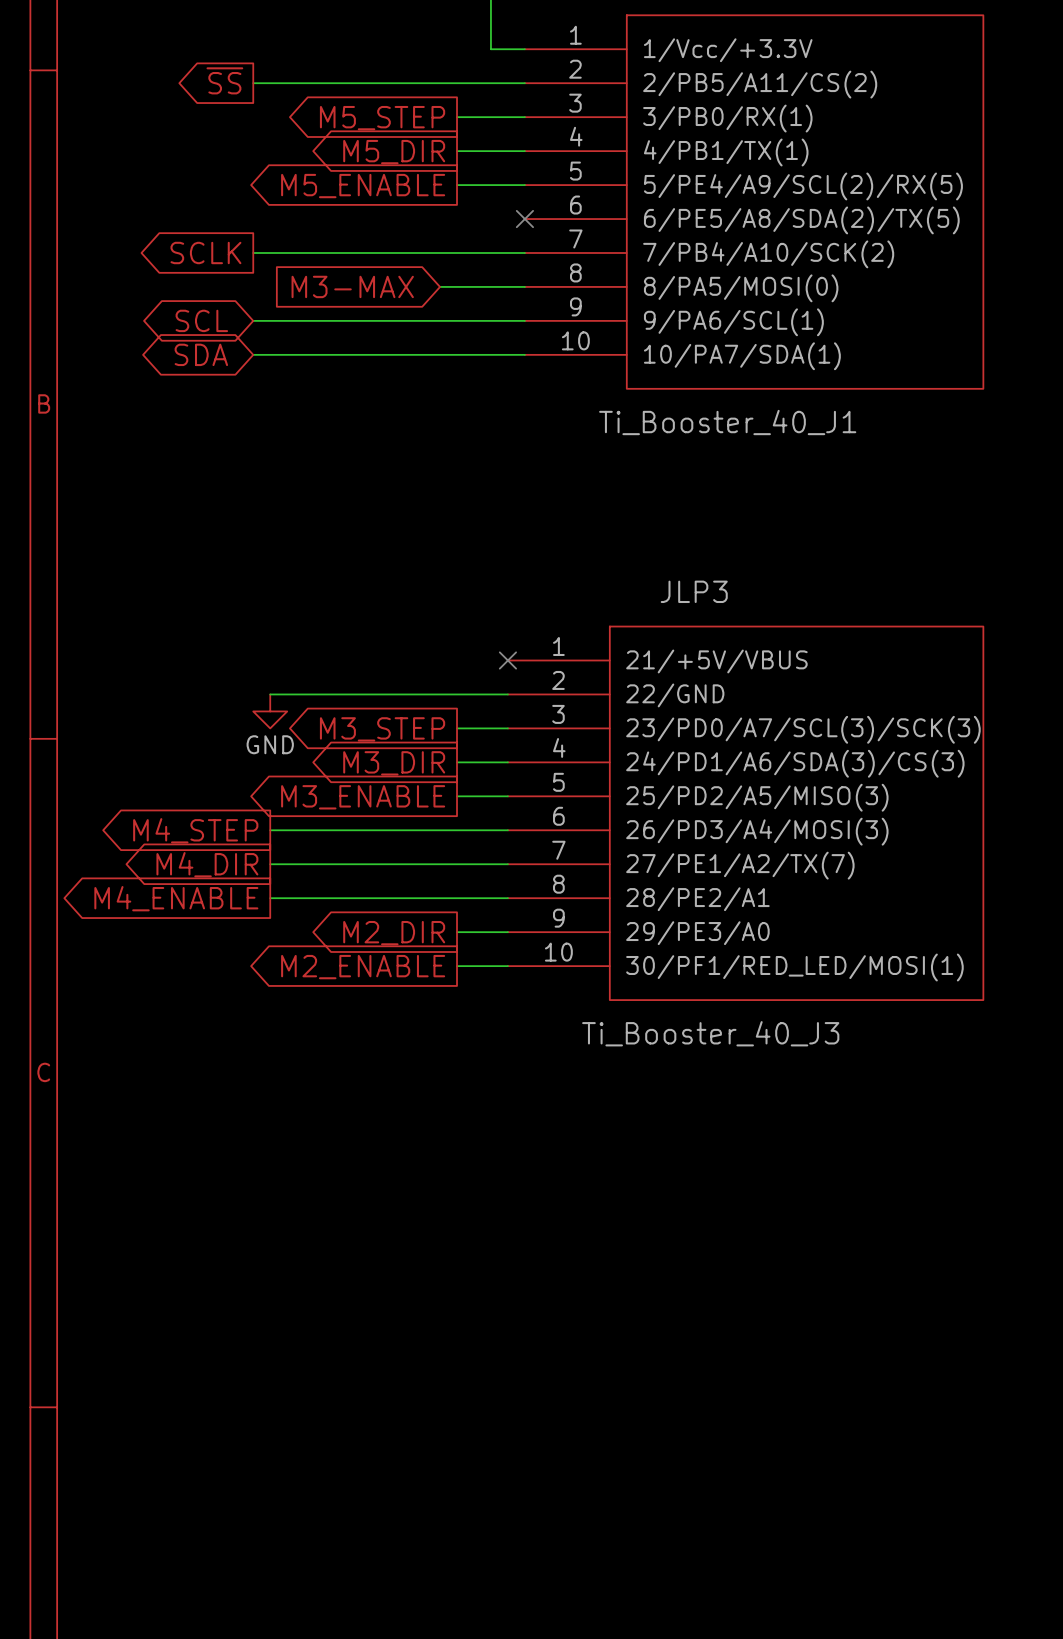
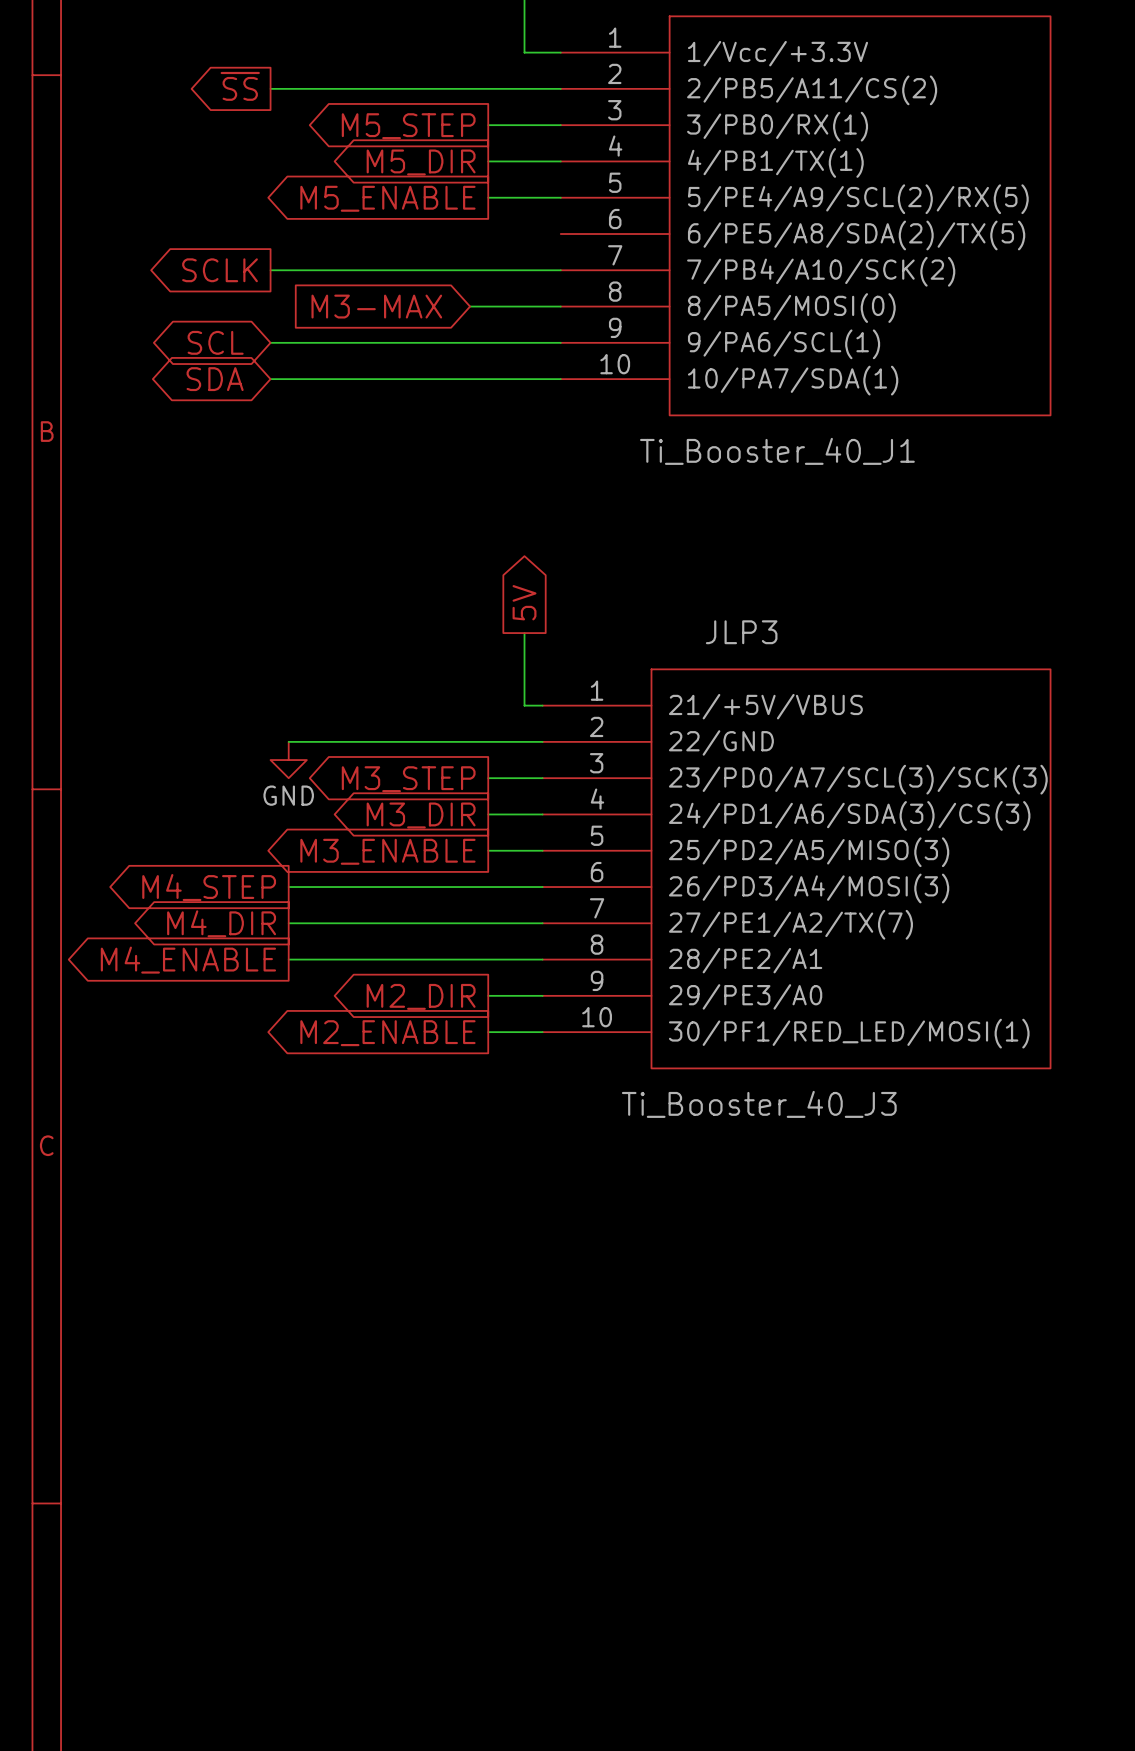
no-connect mark: (524, 219) -> none
global label: none -> 5V (524, 602)
wire: none -> (524, 633) (524, 705) (542, 705)
no-connect mark: (507, 660) -> none

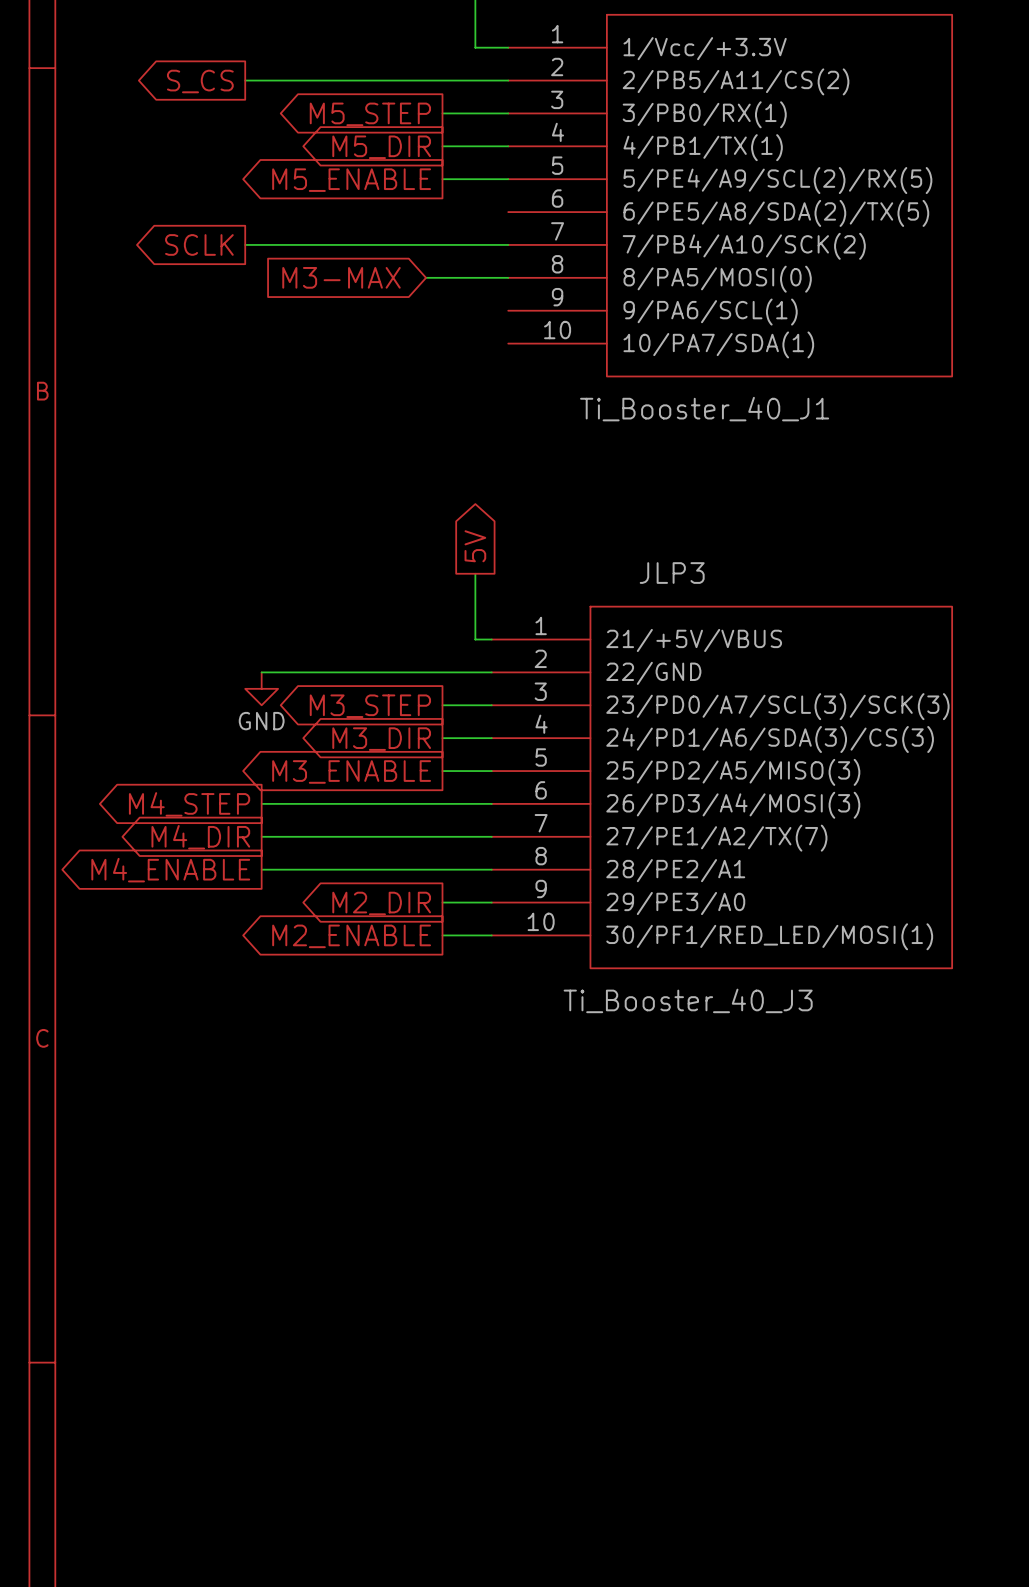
global label: ~{SS} (240, 86) -> S_CS (200, 81)
global label: SCL (215, 342) -> none
wire: (270, 342) (560, 342) -> none
global label: SDA (215, 379) -> none
wire: (270, 379) (560, 379) -> none

